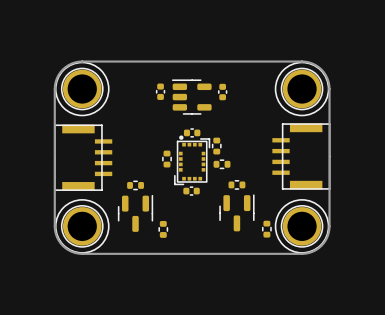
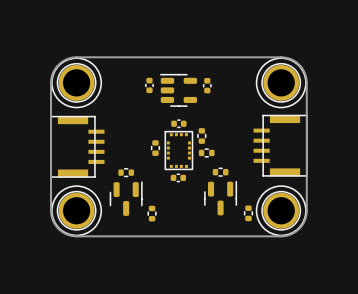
part footprint: [174, 135, 211, 186] -> [164, 131, 194, 170]

